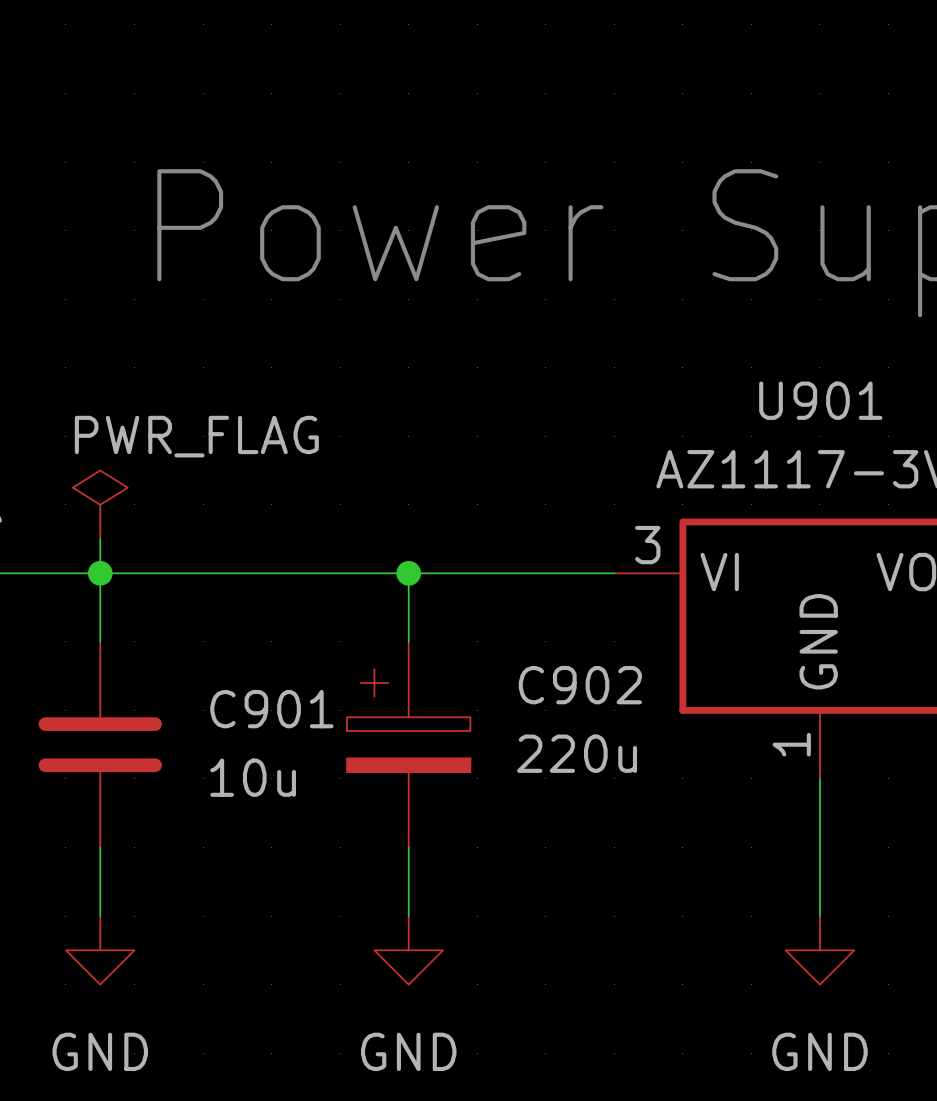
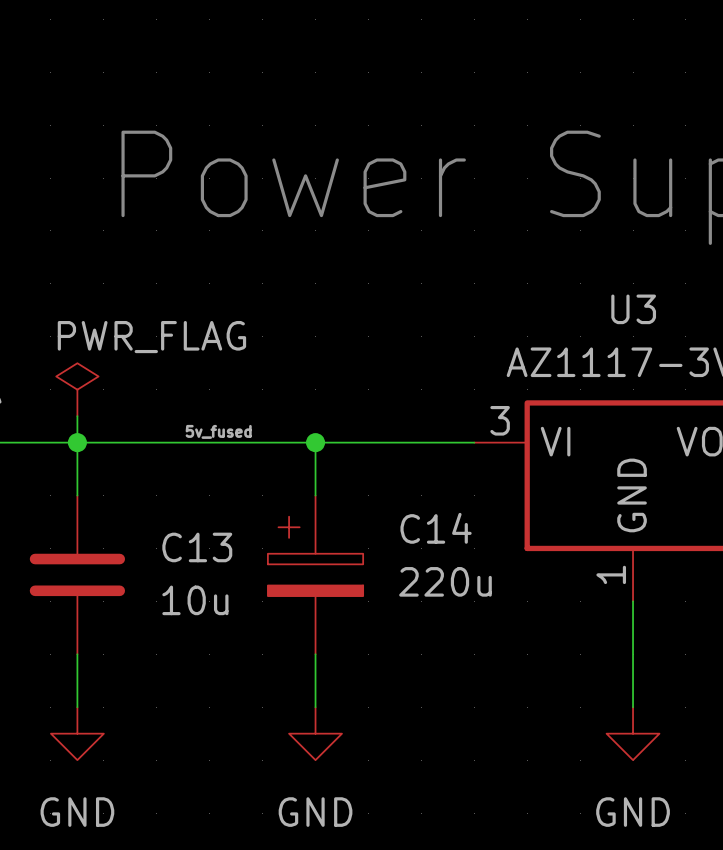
U901 name: U901 (820, 400) -> U3 (633, 309)
label: none -> 5v_fused (218, 431)
C902 name: C902 (580, 685) -> C14 (436, 528)
C901 name: C901 (271, 709) -> C13 (197, 547)

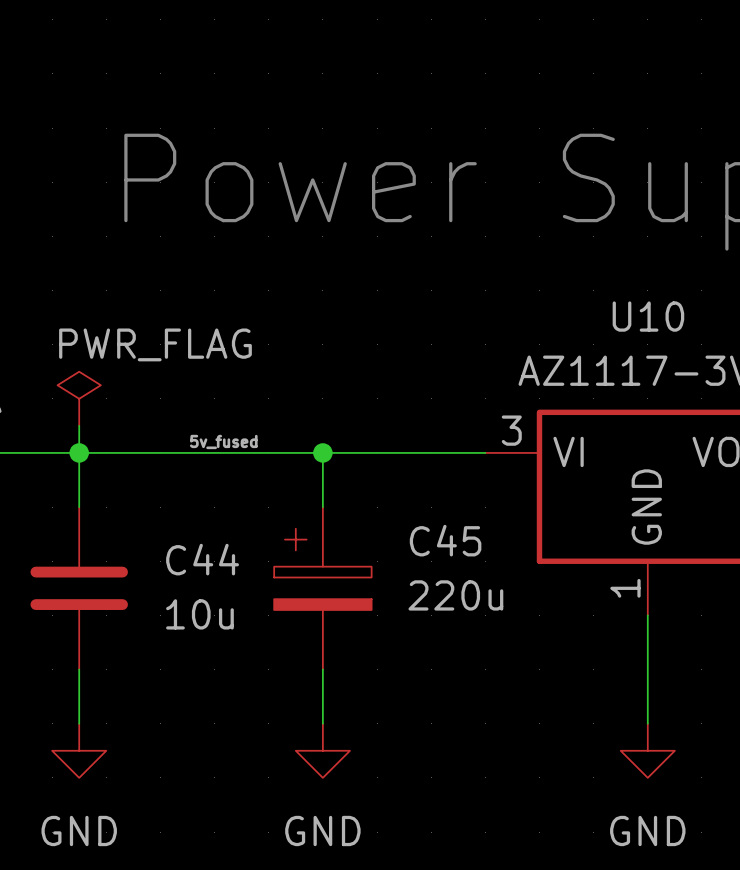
U3 name: U3 (633, 309) -> U10 (648, 316)
C14 name: C14 (436, 528) -> C45 (445, 540)
C13 name: C13 (197, 547) -> C44 (202, 559)

